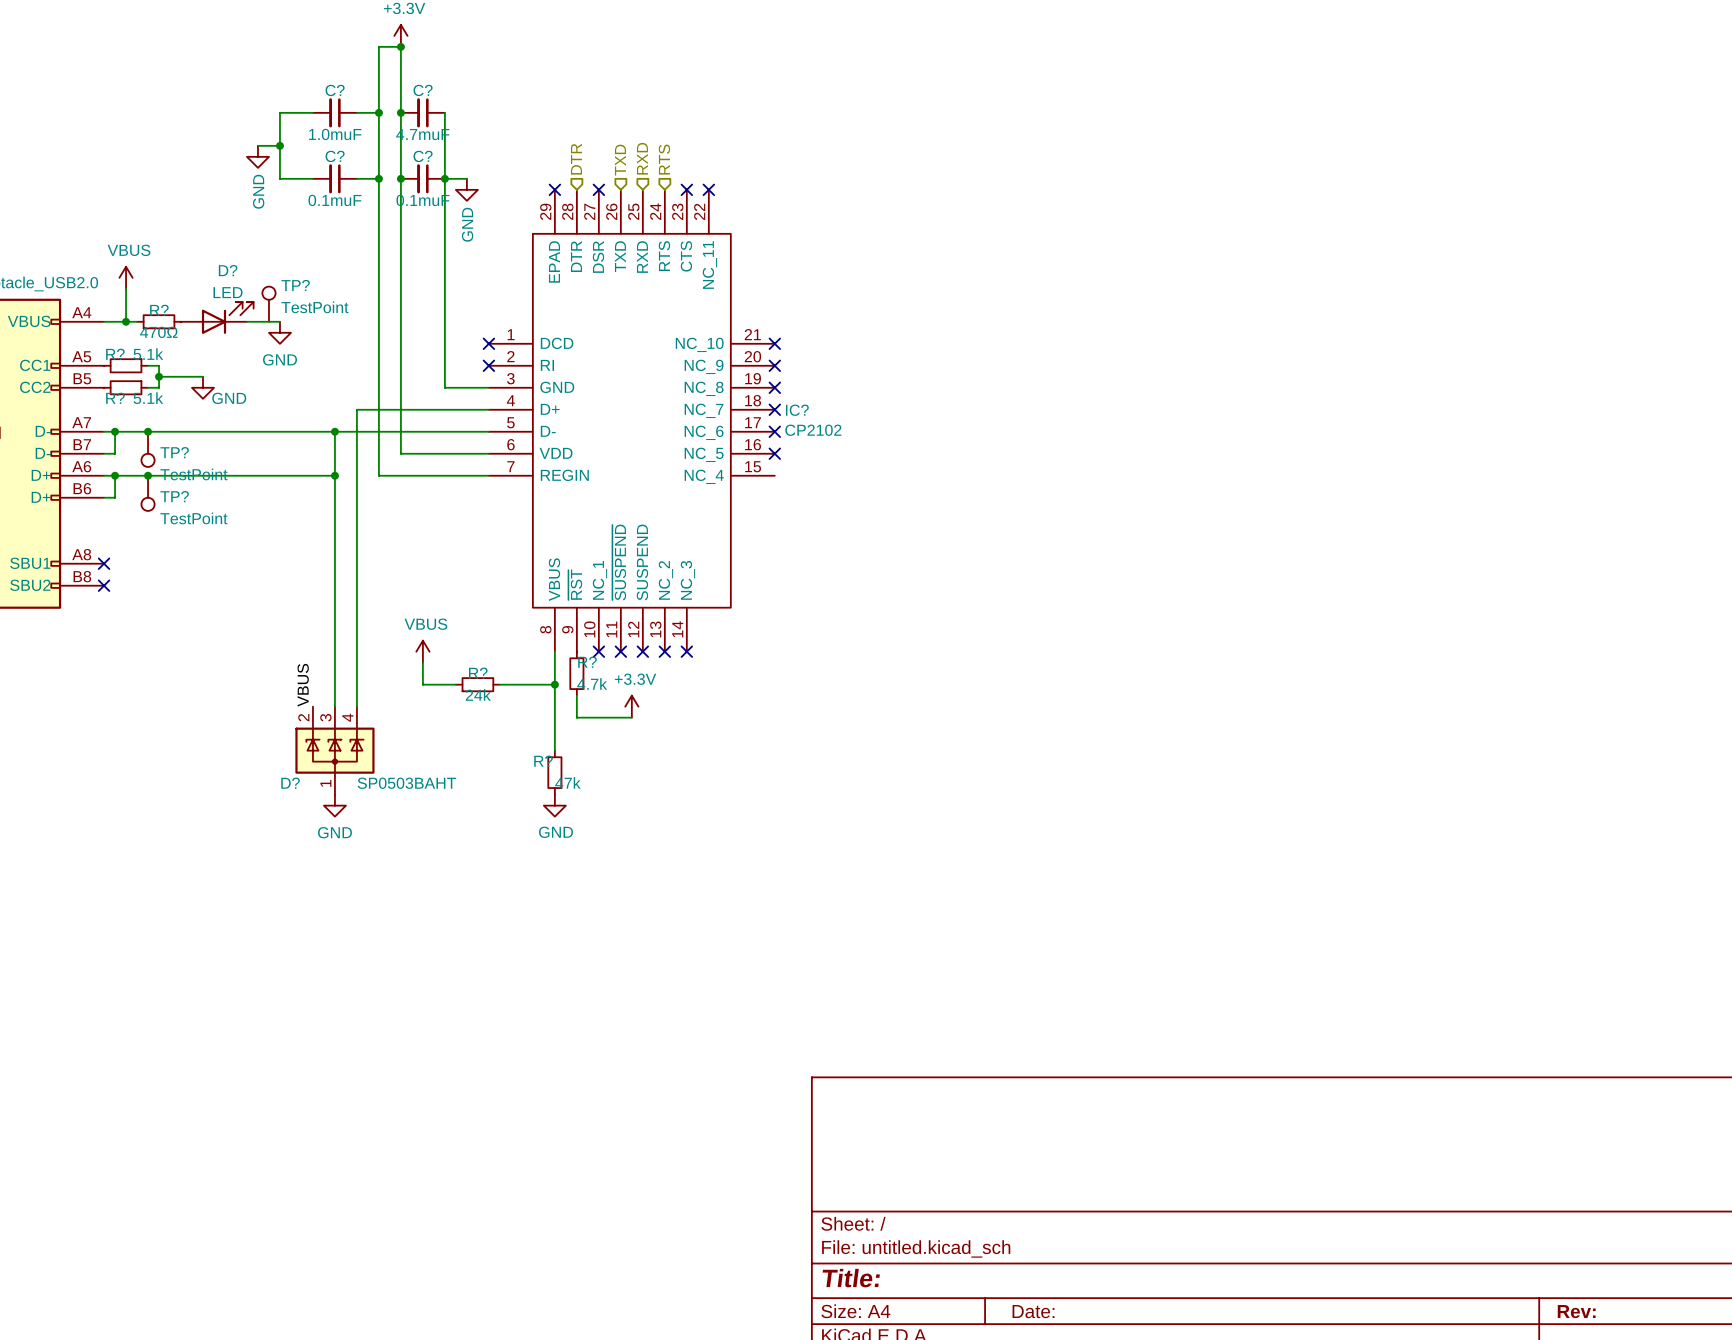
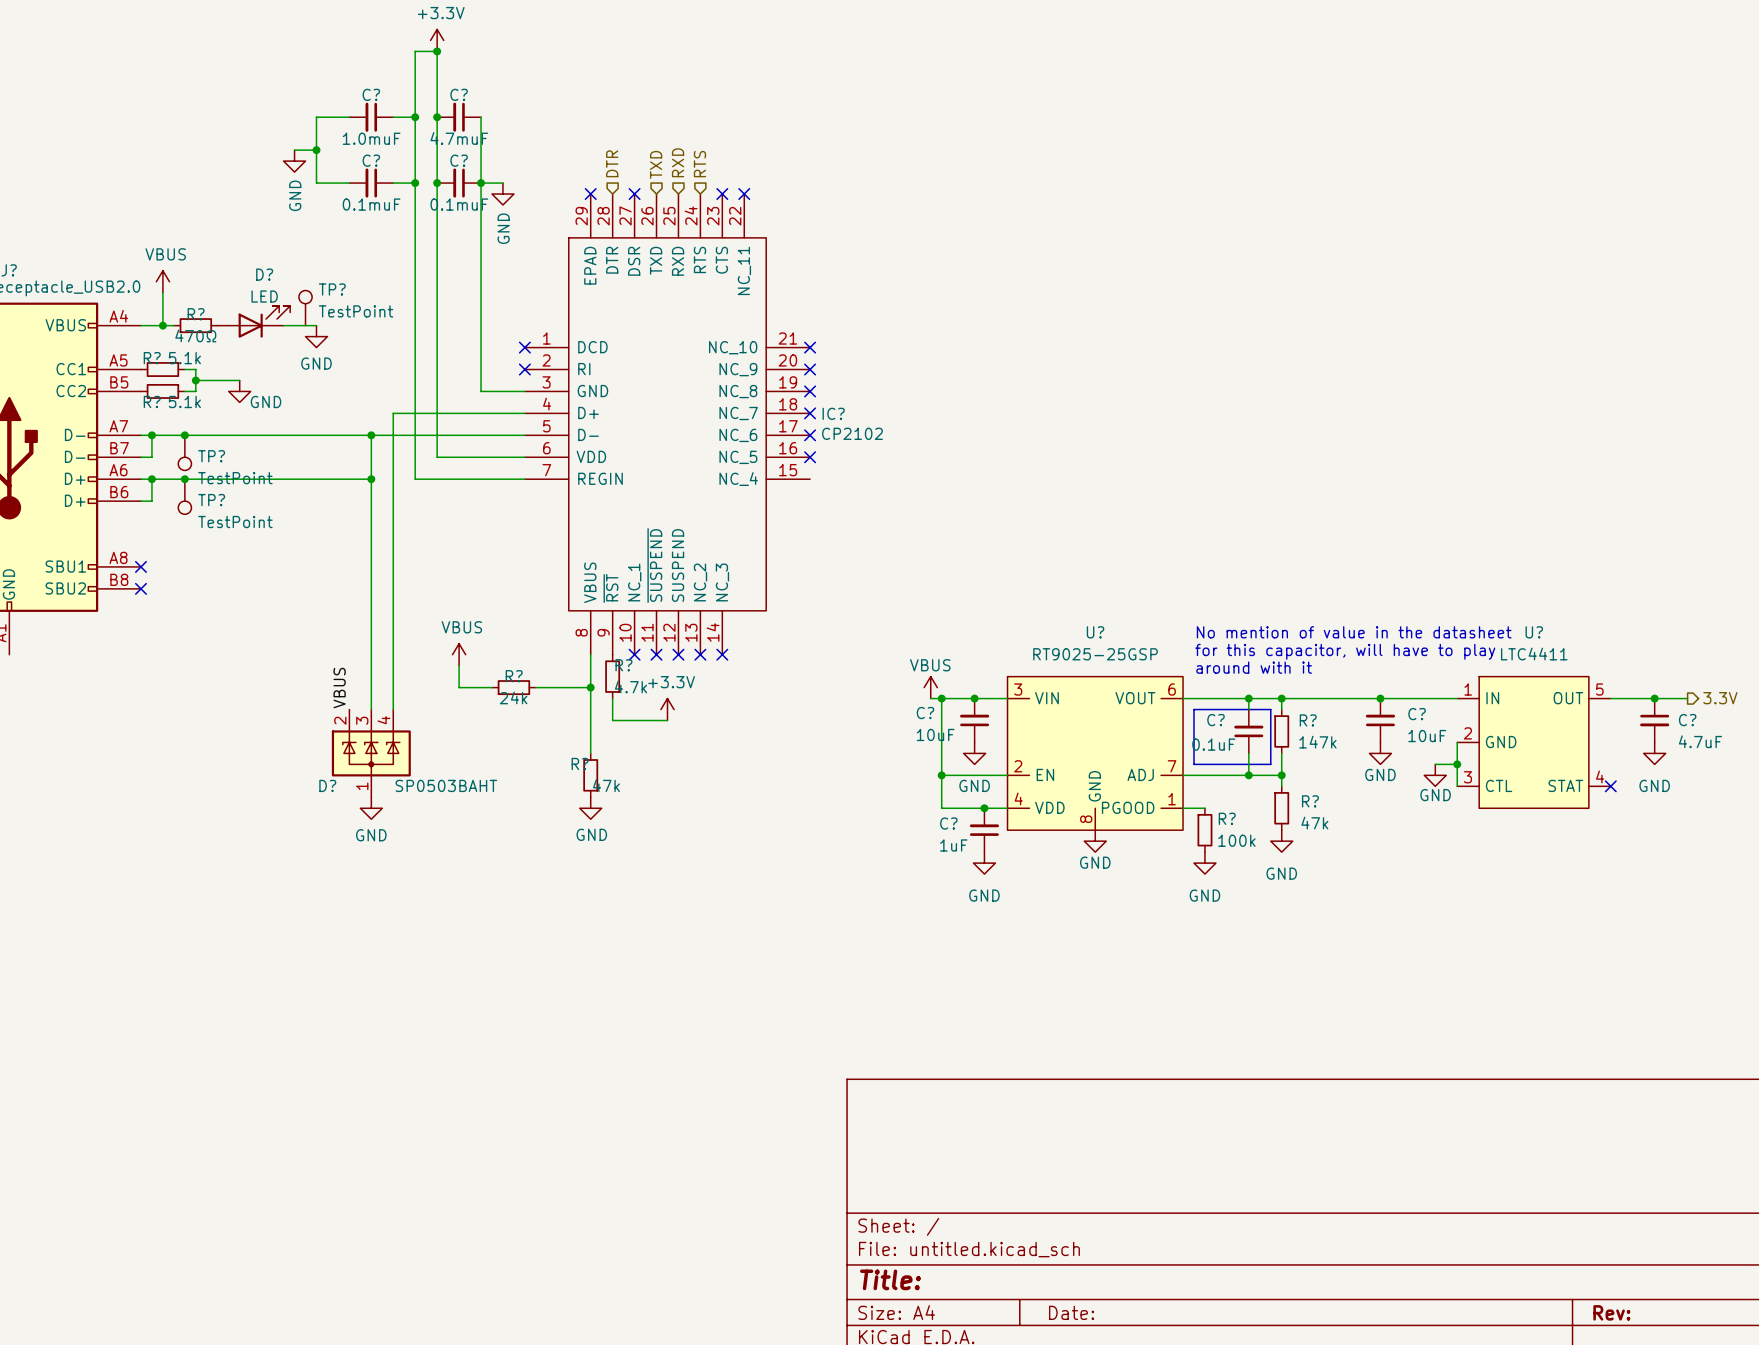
text: none -> No mention of value in the datasheet (1354, 632)
text: none -> for this capacitor, will have to play (1345, 651)
text: none -> around with it (1254, 667)
power symbol: none -> VBUS (930, 687)
wire: none -> (930, 698) (1007, 698)
wire: none -> (941, 698) (941, 808) (1007, 808)
junction: none -> (941, 698)
junction: none -> (974, 698)
wire: none -> (1183, 698) (1457, 698)
wire: none -> (1248, 698) (1248, 709)
junction: none -> (1248, 698)
wire: none -> (1281, 698) (1281, 709)
junction: none -> (1281, 698)
junction: none -> (1380, 698)
wire: none -> (1610, 698) (1687, 698)
junction: none -> (1654, 698)
hierarchical label: none -> 3.3V (1720, 698)
line: none -> (1193, 709) (1193, 764) (1270, 764) (1270, 709) (1193, 709)
C?: none -> 10uF (974, 720)
C?: none -> 10uF (1380, 720)
C?: none -> 4.7uF (1654, 720)
C?: none -> 0.1uF (1248, 731)
R?: none -> 147k (1281, 731)
wire: none -> (1457, 742) (1457, 786)
U?: none -> LTC4411 (1534, 742)
power symbol: none -> GND (974, 753)
U?: none -> RT9025-25GSP (1095, 753)
wire: none -> (1248, 753) (1248, 775)
wire: none -> (1281, 753) (1281, 786)
power symbol: none -> GND (1380, 753)
power symbol: none -> GND (1654, 753)
wire: none -> (1435, 764) (1457, 764)
junction: none -> (1457, 764)
wire: none -> (941, 775) (1007, 775)
junction: none -> (941, 775)
wire: none -> (1183, 775) (1281, 775)
junction: none -> (1248, 775)
junction: none -> (1281, 775)
power symbol: none -> GND (1435, 775)
no-connect mark: none -> (1610, 786)
junction: none -> (984, 808)
wire: none -> (1183, 808) (1204, 808)
R?: none -> 47k (1281, 808)
C?: none -> 1uF (984, 830)
R?: none -> 100k (1204, 830)
power symbol: none -> GND (1095, 841)
power symbol: none -> GND (1281, 841)
power symbol: none -> GND (984, 863)
power symbol: none -> GND (1204, 863)

